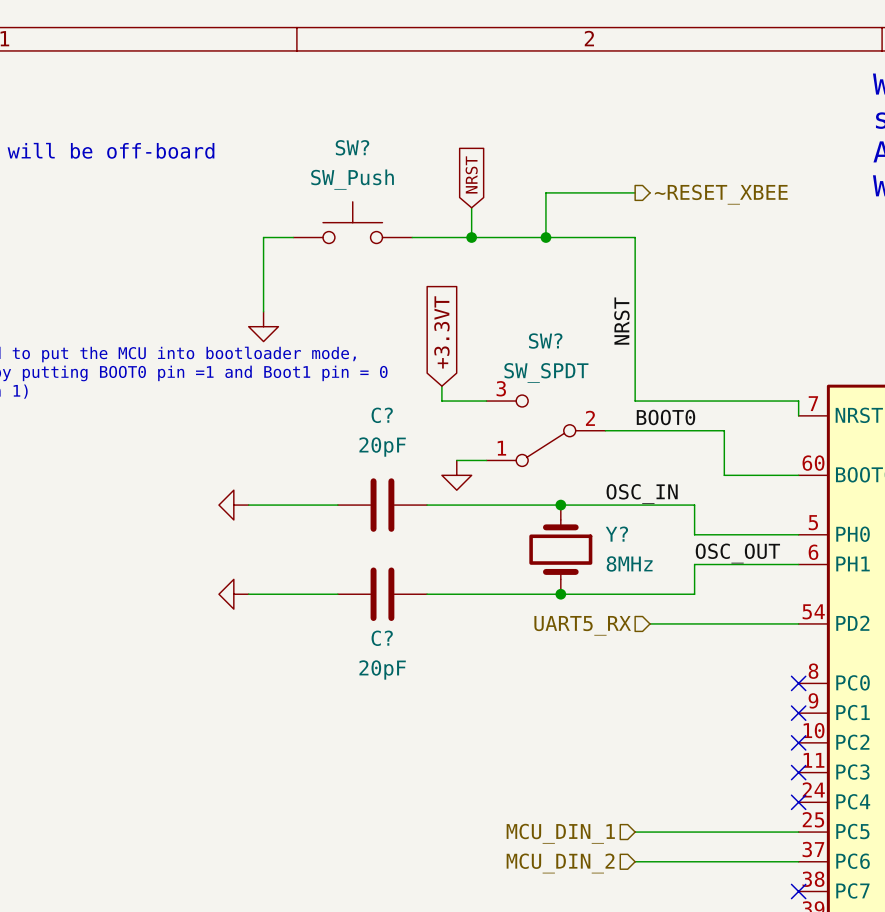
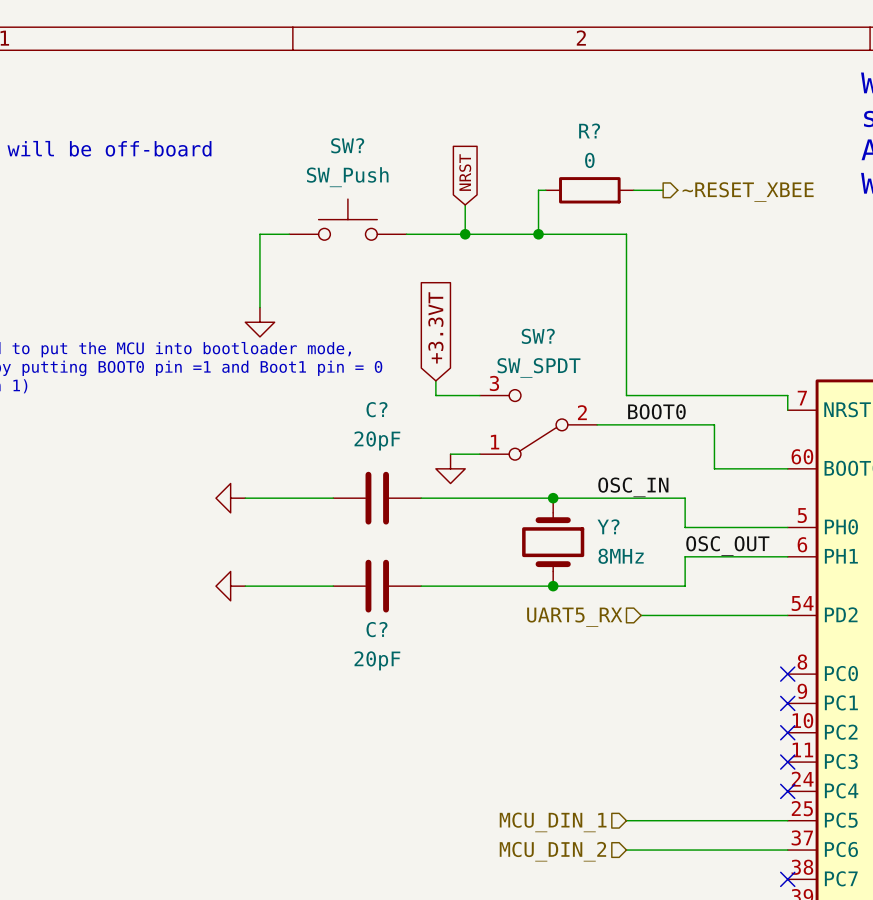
wire: (553, 192) (635, 192) -> none
R?: none -> 0 (589, 190)
wire: none -> (633, 190) (663, 190)
hierarchical label position: ~RESET_XBEE (721, 194) -> ~RESET_XBEE (748, 191)
label: NRST (621, 321) -> none

